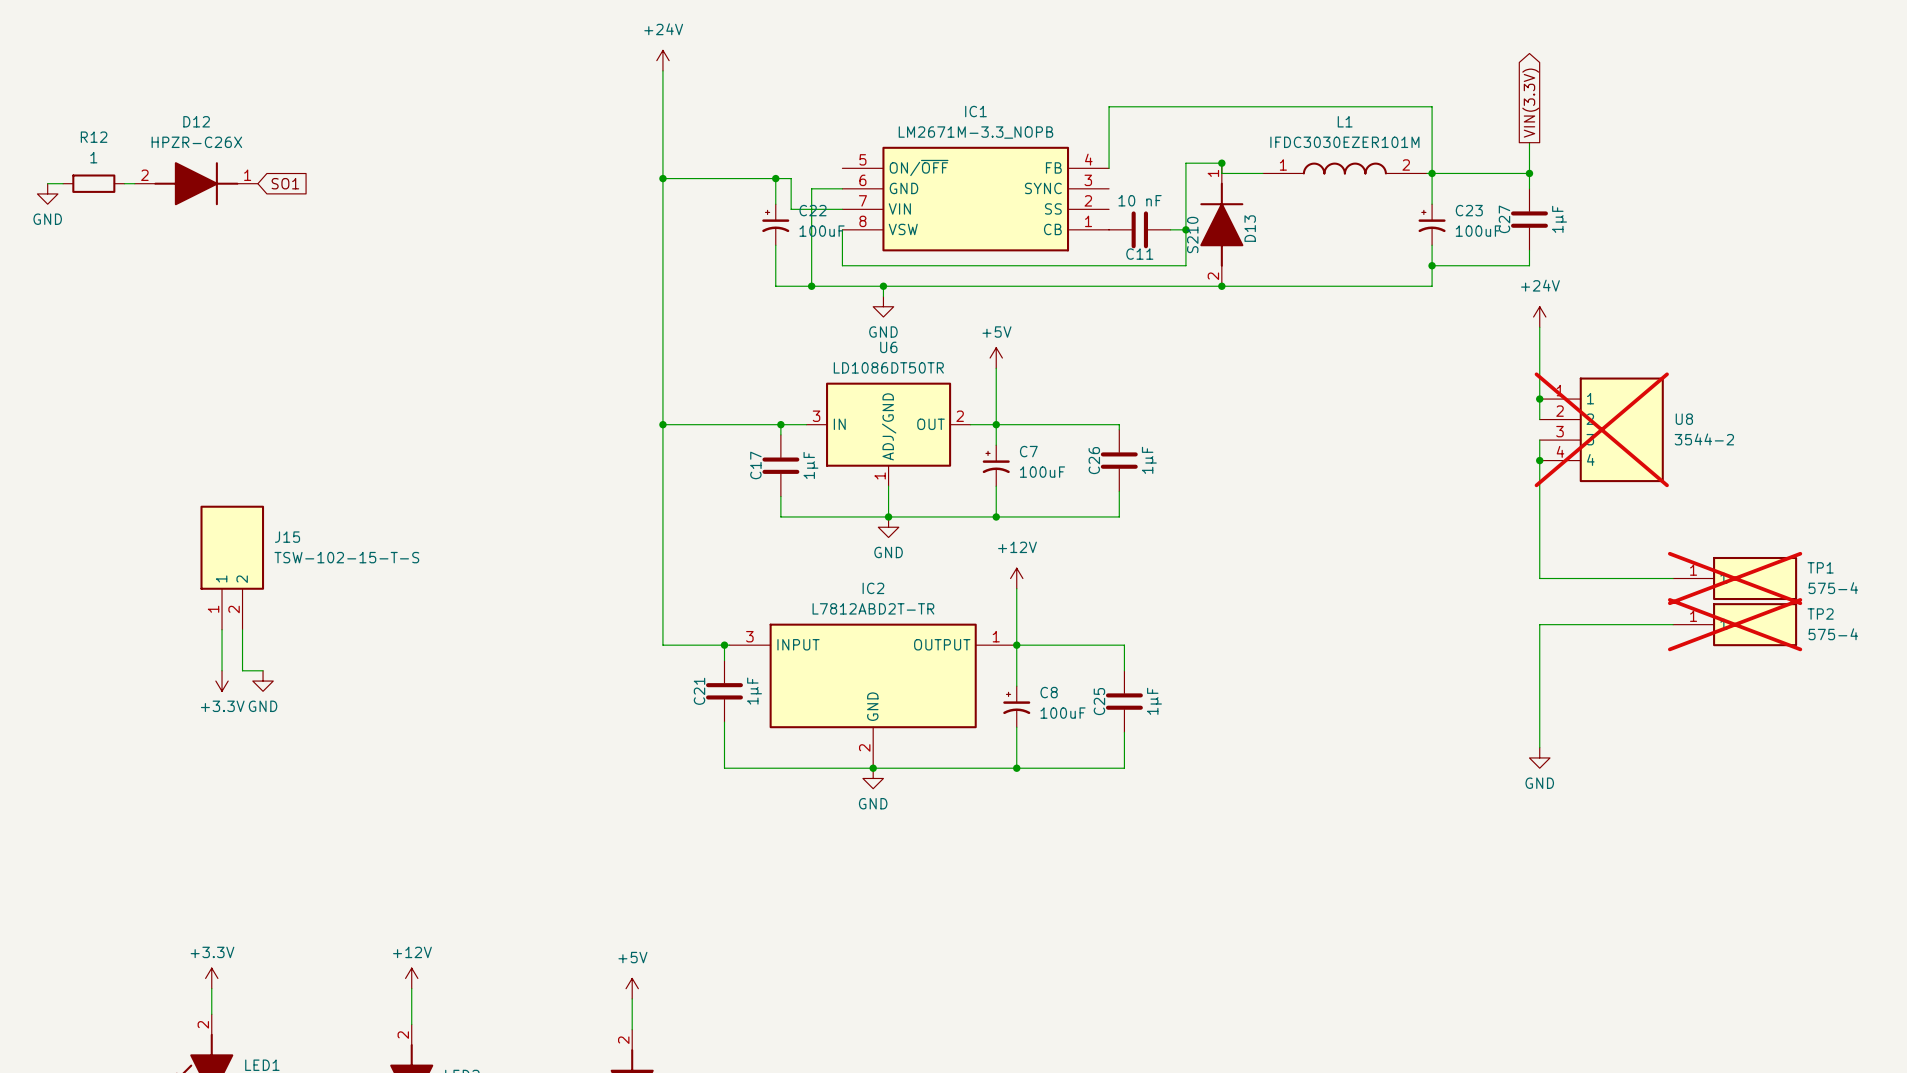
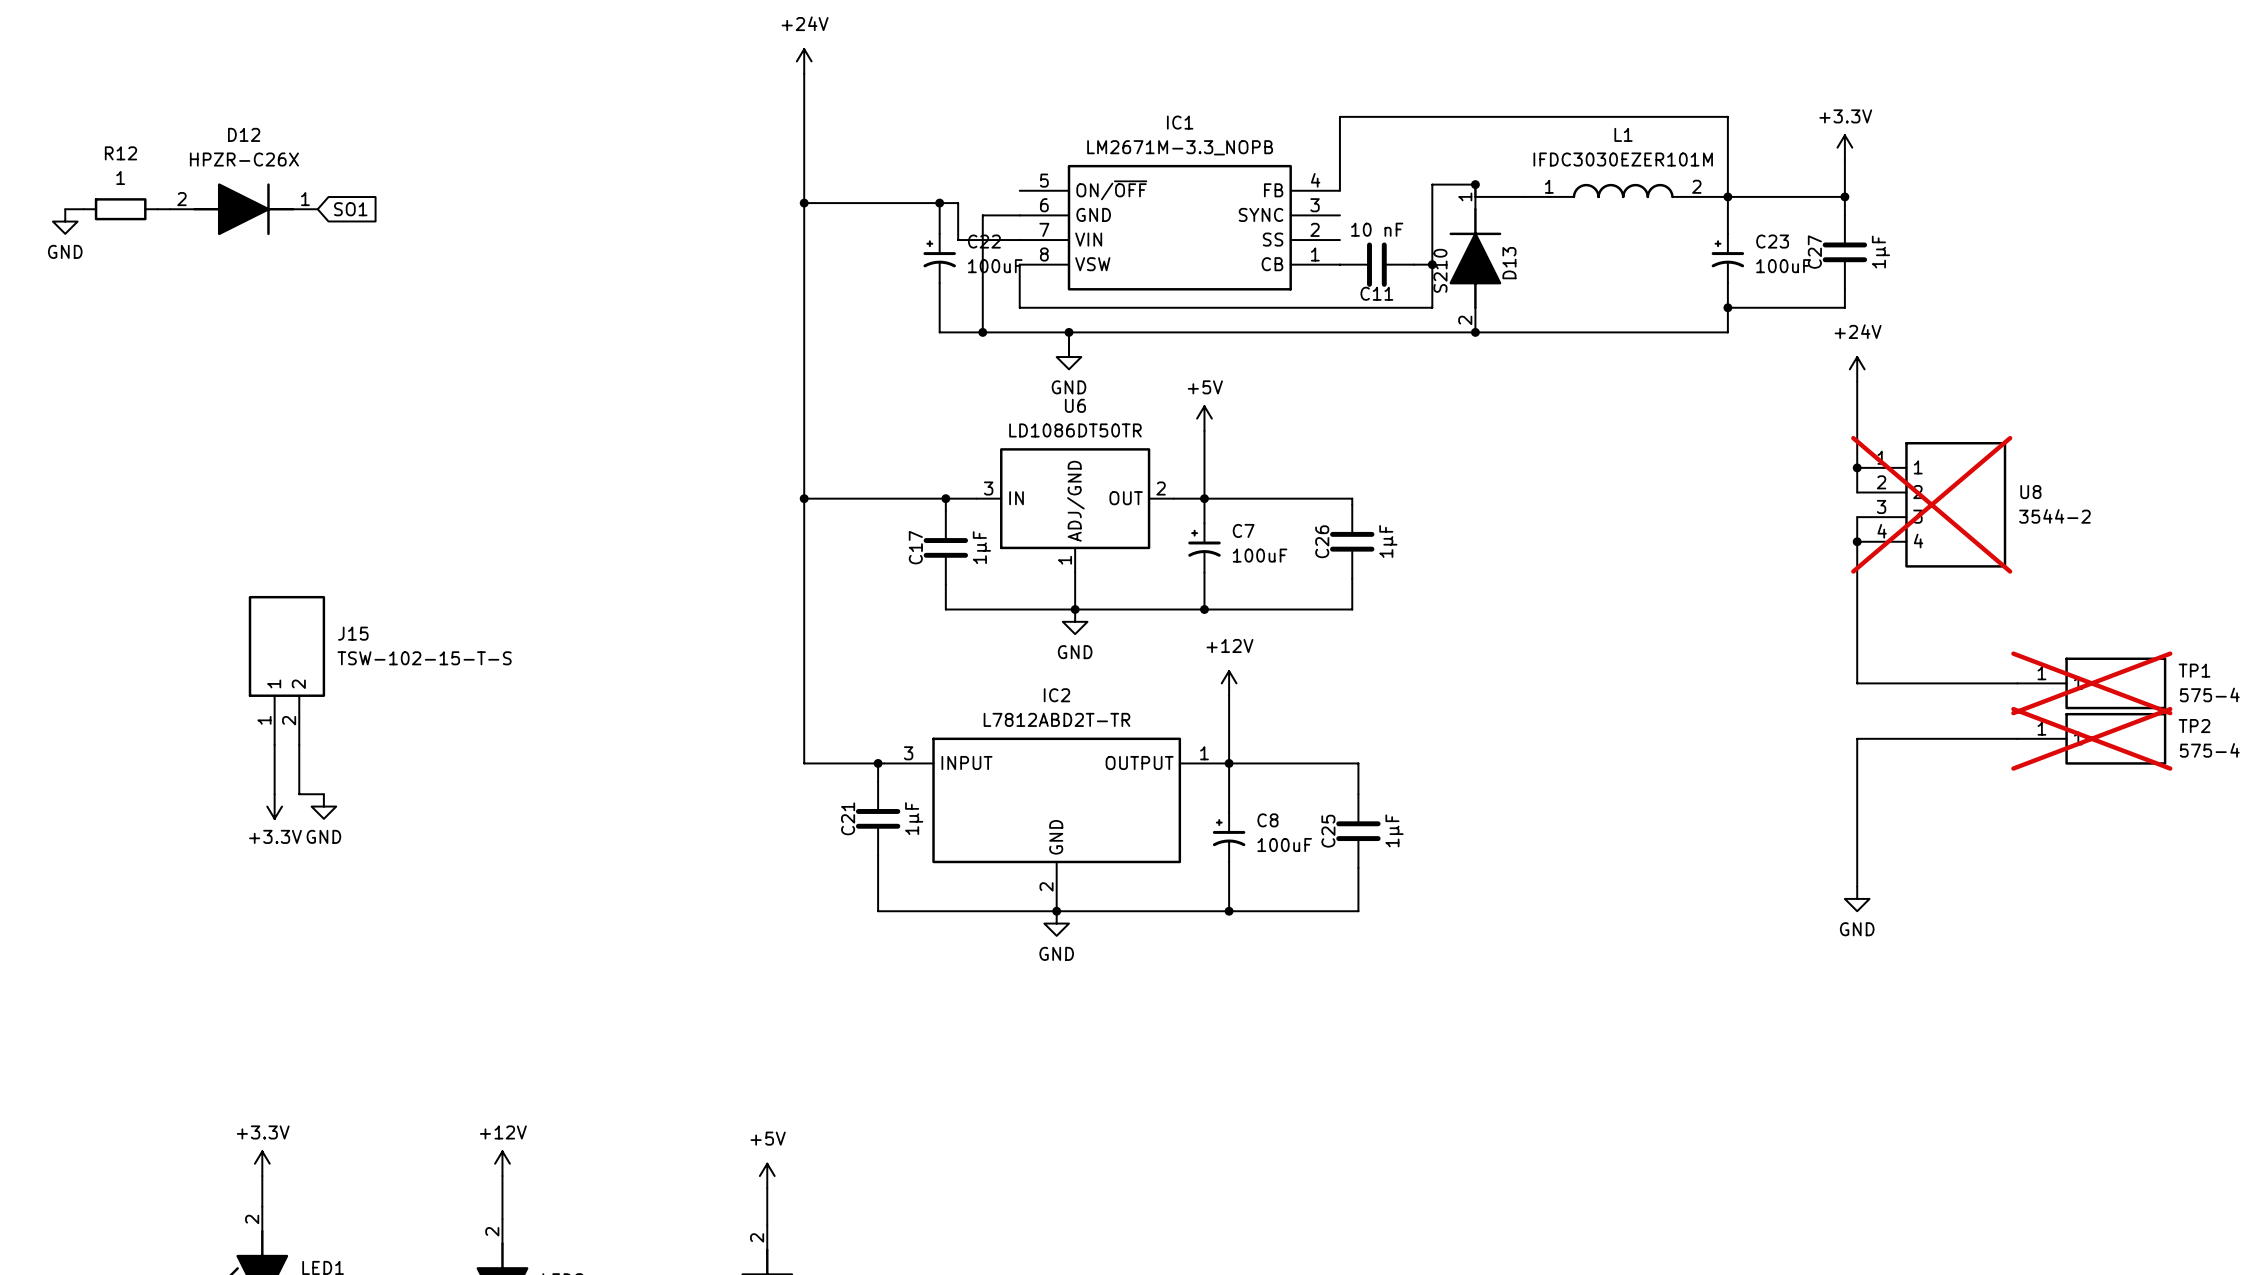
global label: VIN(3.3V) (1530, 103) -> none
power symbol: none -> +3.3V (1844, 147)

